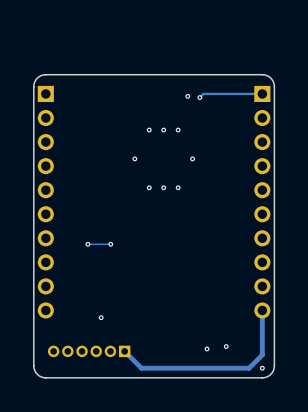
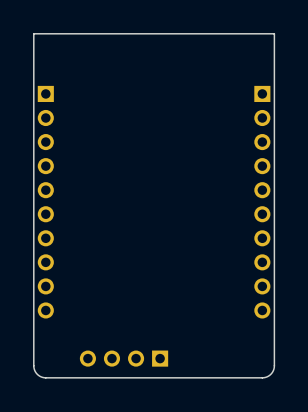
board edge: (274, 86) (270, 78) (262, 74) (45, 74) (37, 78) (33, 86) -> (274, 86) (274, 33) (33, 33) (33, 86)
track: (262, 93) (203, 93) (199, 97) -> none
via: (187, 96) -> none
via: (199, 97) -> none
via: (149, 130) -> none
via: (163, 130) -> none
via: (178, 130) -> none
via: (134, 158) -> none
via: (192, 158) -> none
via: (149, 187) -> none
via: (163, 187) -> none
via: (178, 187) -> none
via: (87, 244) -> none
track: (110, 244) (87, 244) -> none
via: (110, 244) -> none
track: (262, 310) (262, 354) (249, 368) (141, 368) (124, 351) -> none
via: (101, 317) -> none
via: (226, 346) -> none
via: (207, 348) -> none
part: (89, 351) -> none
part: none -> (124, 358)
via: (262, 368) -> none

